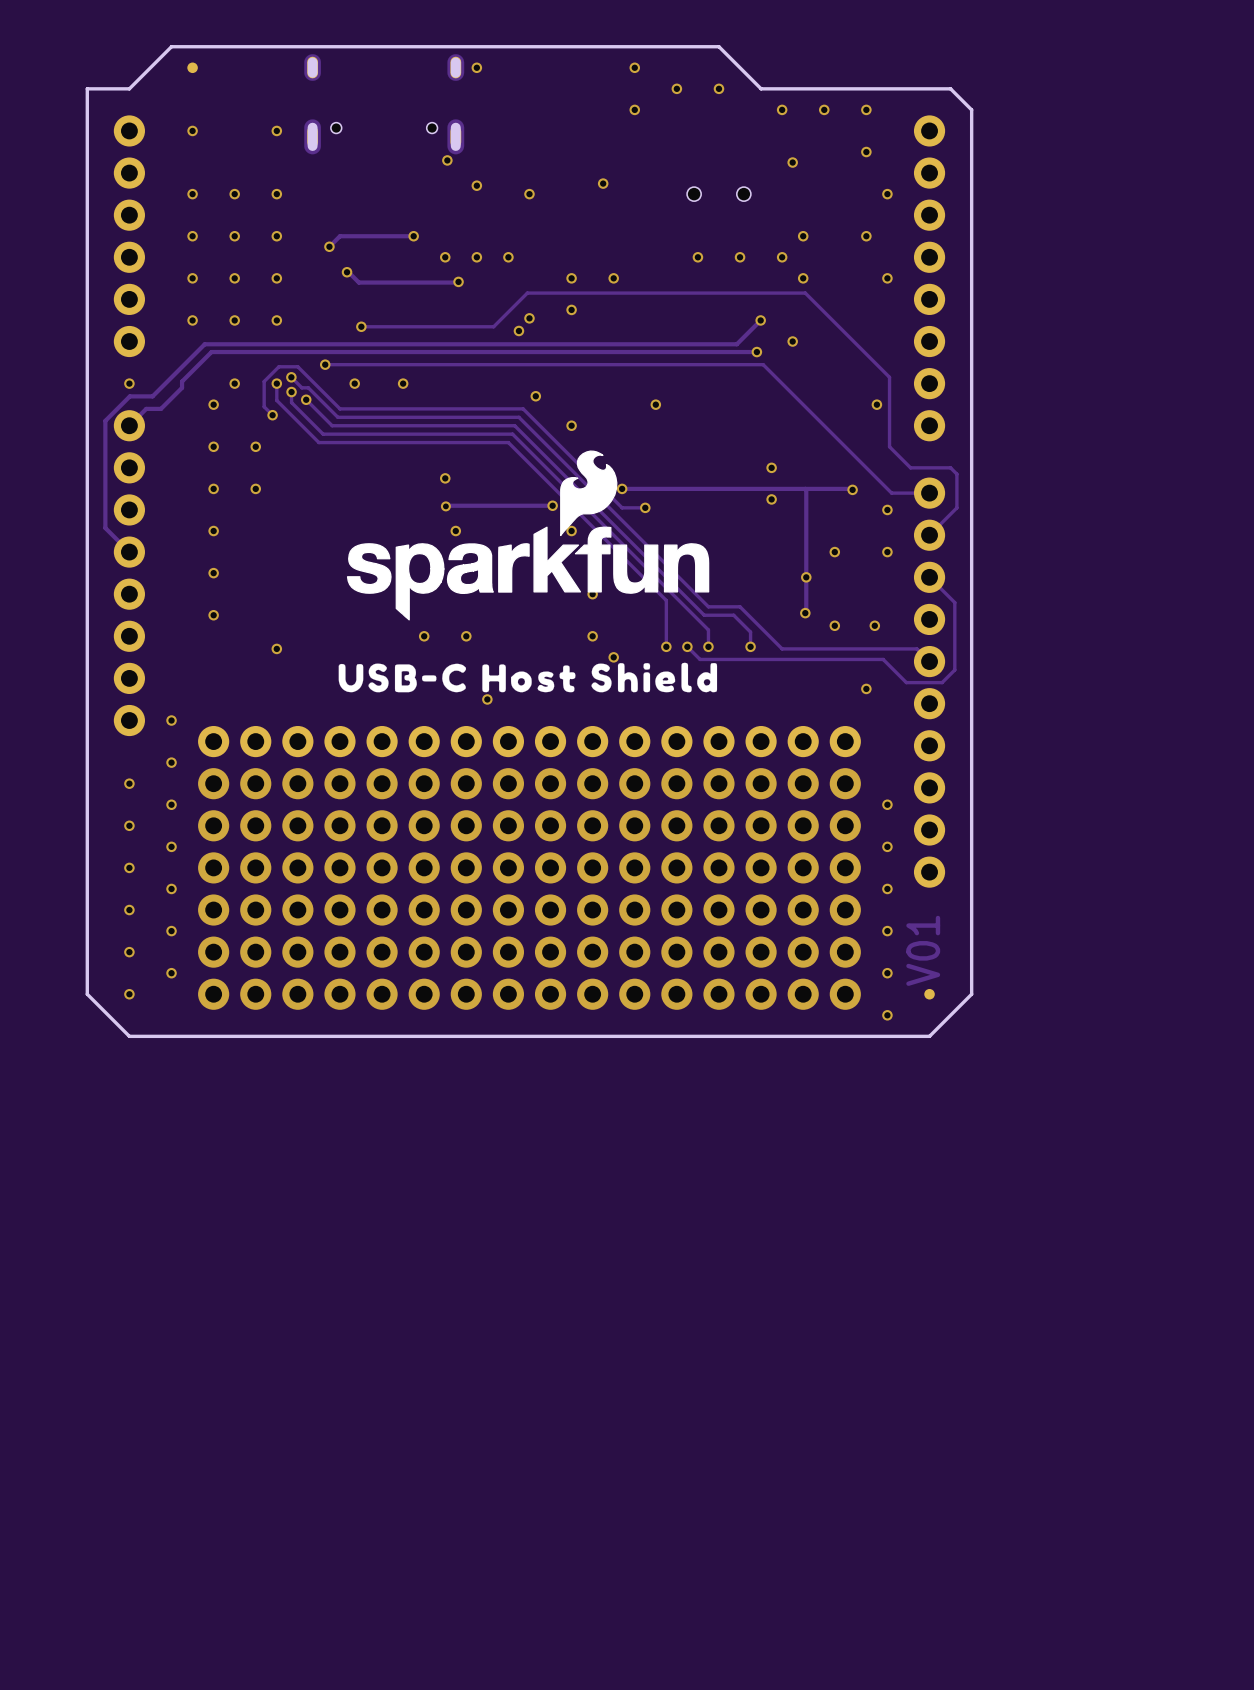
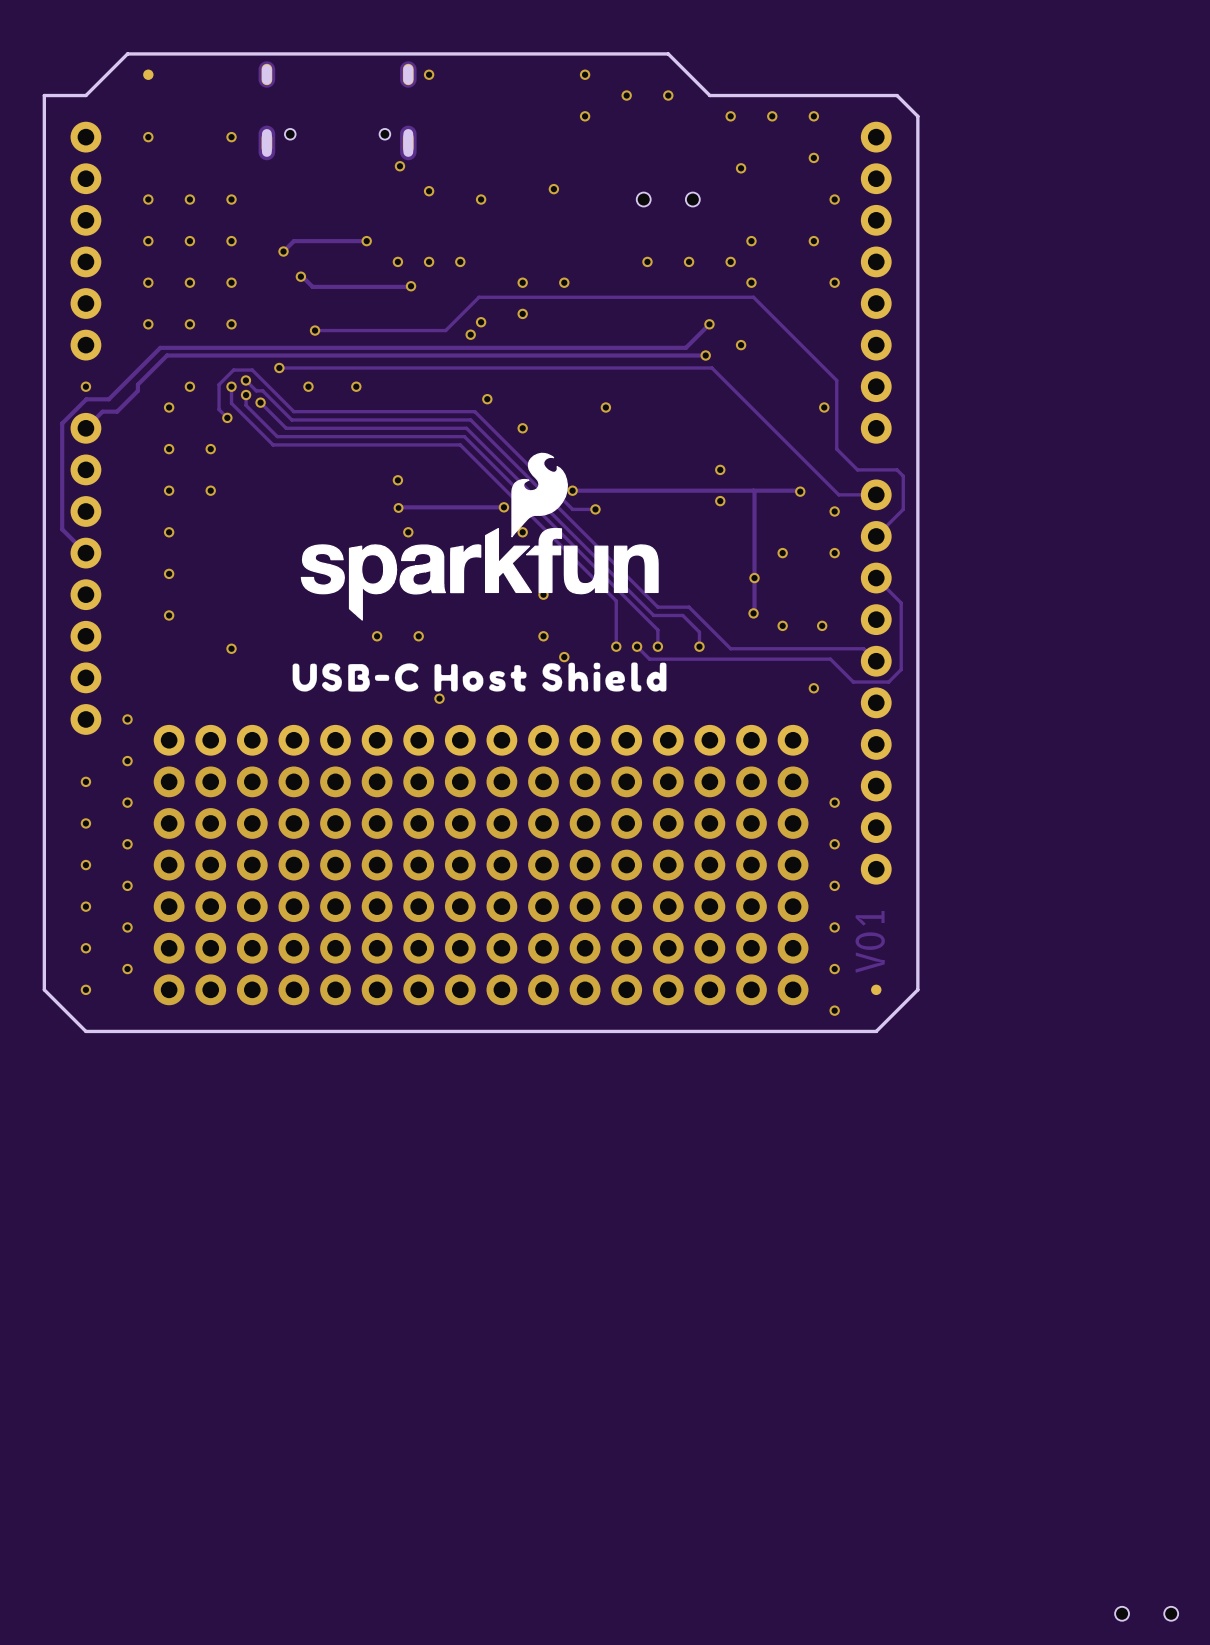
part: none -> (1146, 1613)

